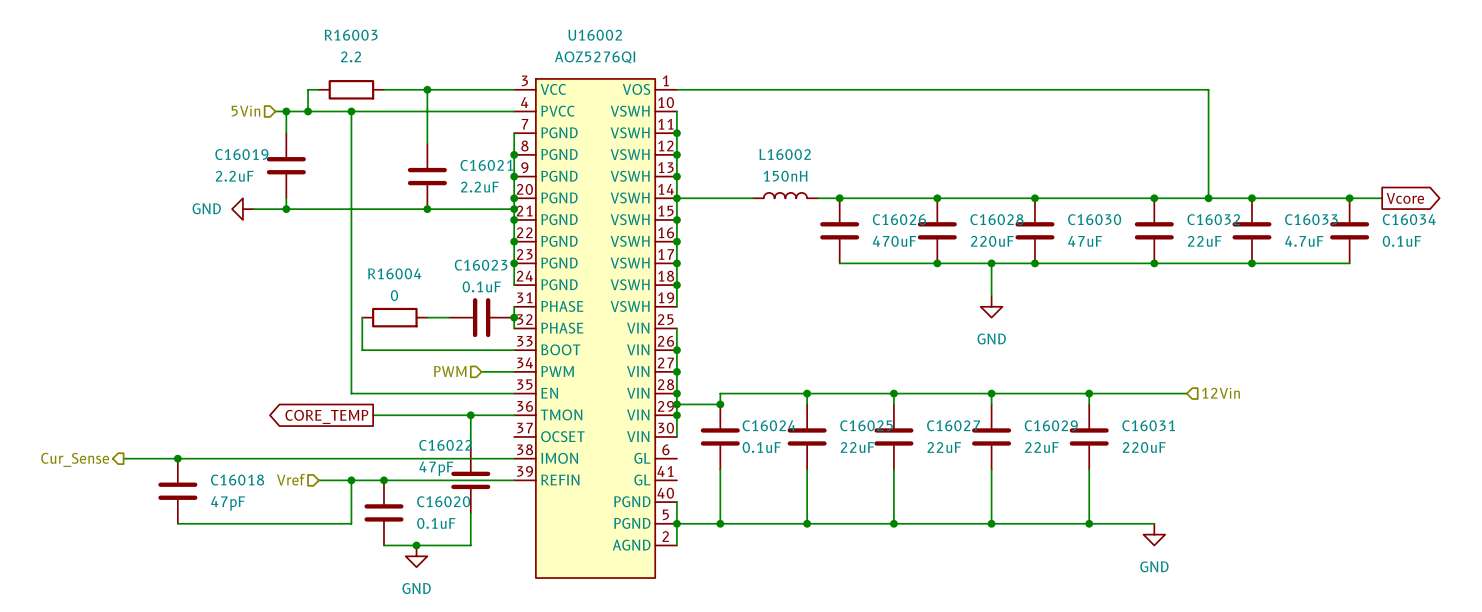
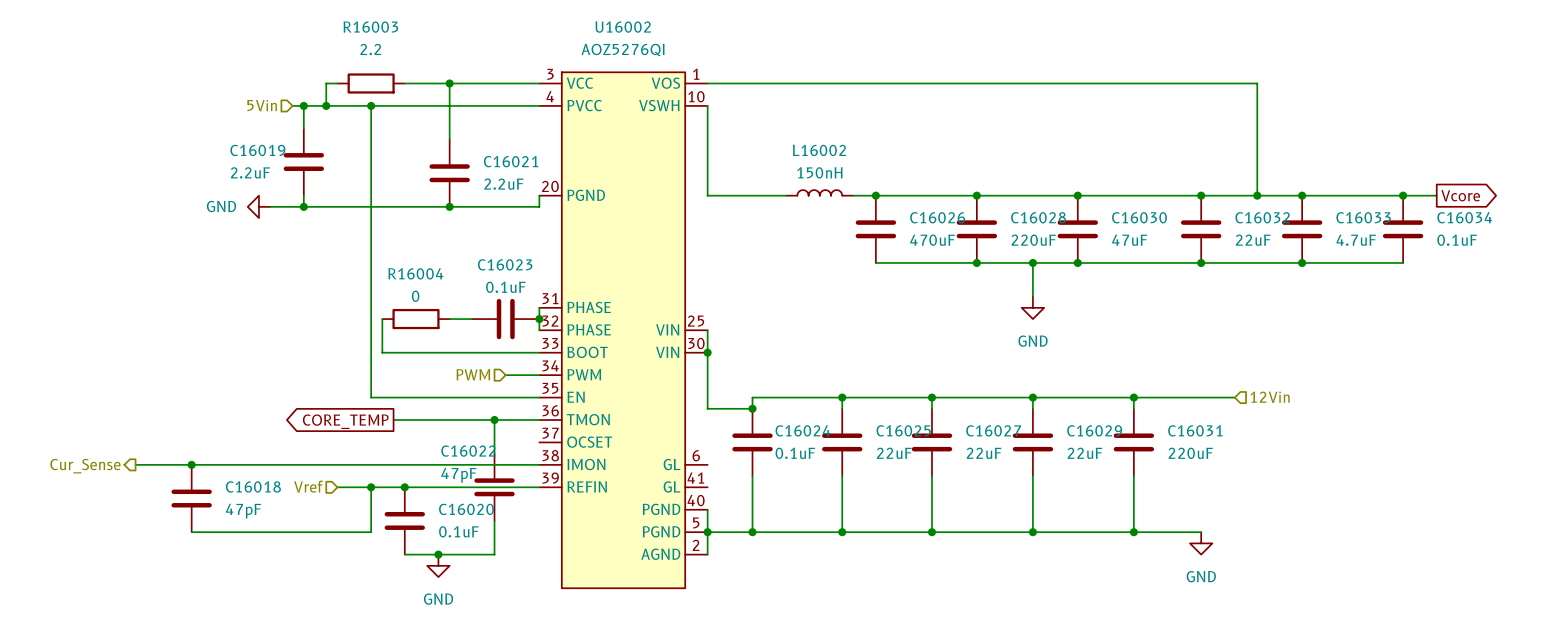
U16002 symbol: [514, 78, 677, 579] -> [539, 72, 708, 589]
wire: (514, 133) (514, 198) -> none
junction: (676, 133) -> none
junction: (514, 154) -> none
junction: (676, 154) -> none
junction: (514, 176) -> none
junction: (676, 176) -> none
junction: (514, 198) -> none
wire: (676, 198) (676, 306) -> none
junction: (676, 198) -> none
wire: (514, 209) (514, 285) -> none
junction: (514, 209) -> none
junction: (514, 219) -> none
junction: (676, 219) -> none
junction: (514, 241) -> none
junction: (676, 241) -> none
junction: (514, 263) -> none
junction: (676, 263) -> none
junction: (676, 285) -> none
junction: (676, 371) -> none
junction: (676, 393) -> none
wire: (676, 404) (676, 436) -> none
junction: (676, 404) -> none
junction: (676, 415) -> none

